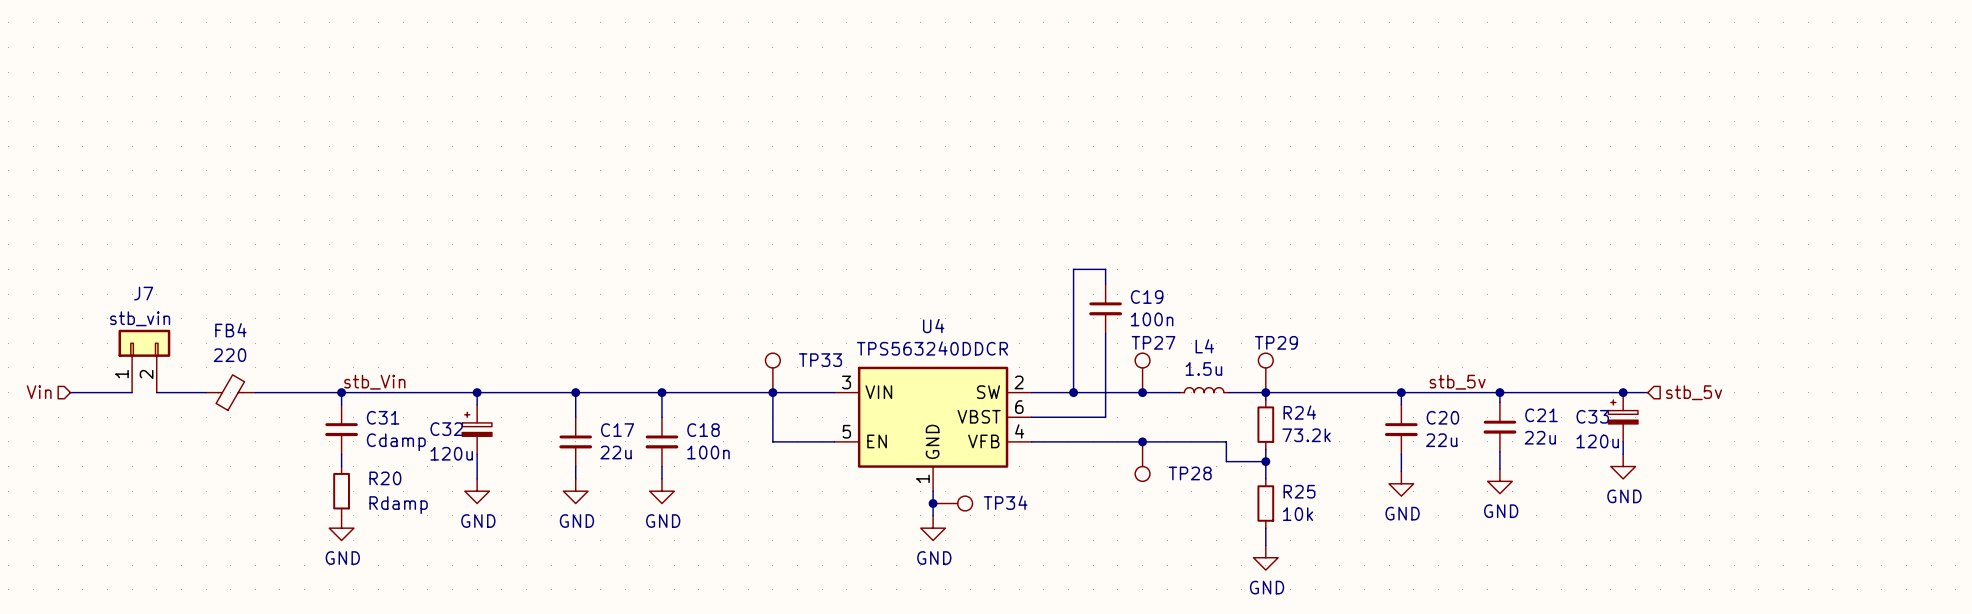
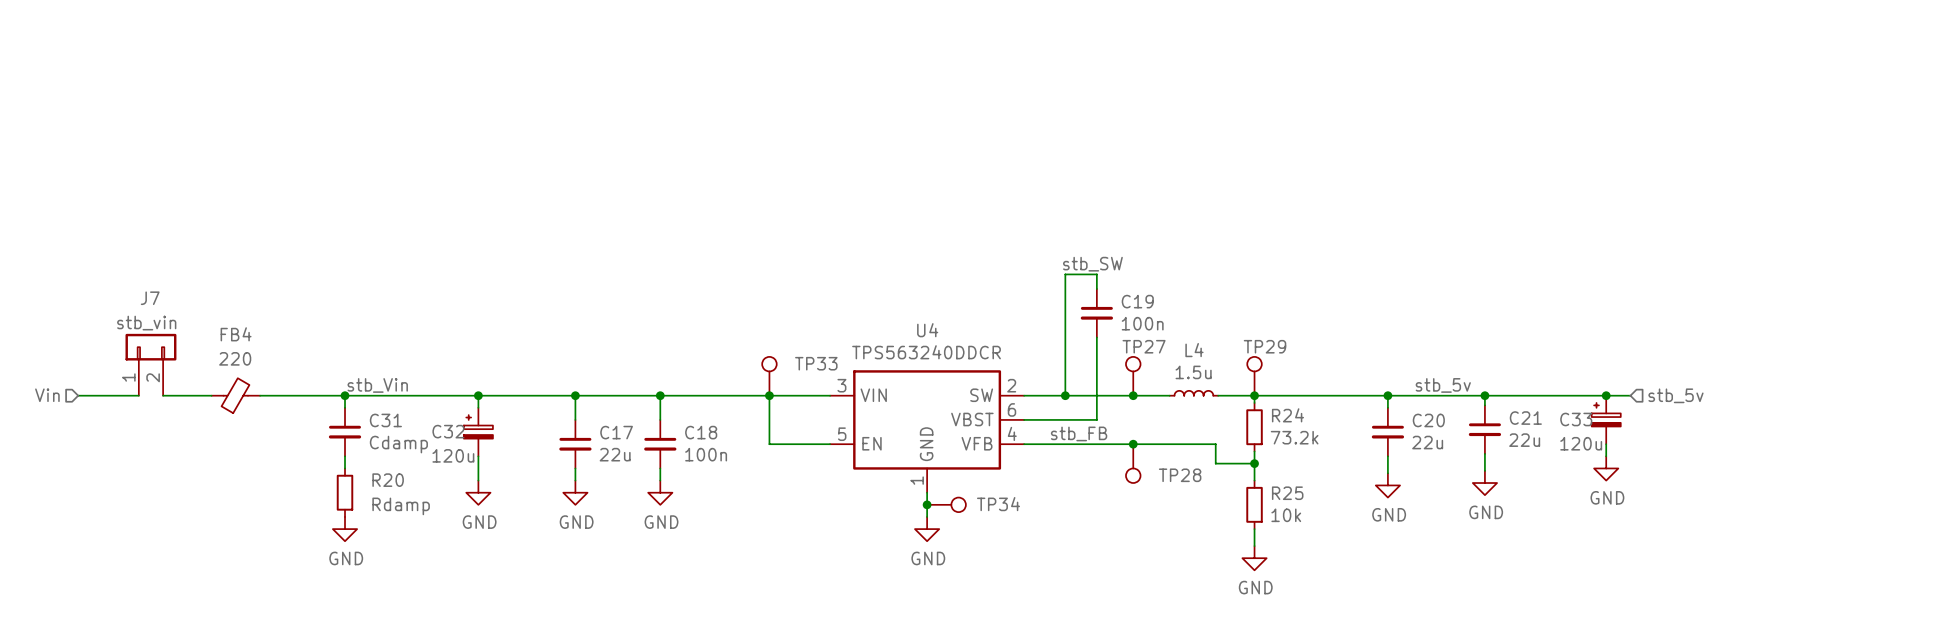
label: none -> stb_SW (1092, 264)
label: none -> stb_FB (1079, 433)

